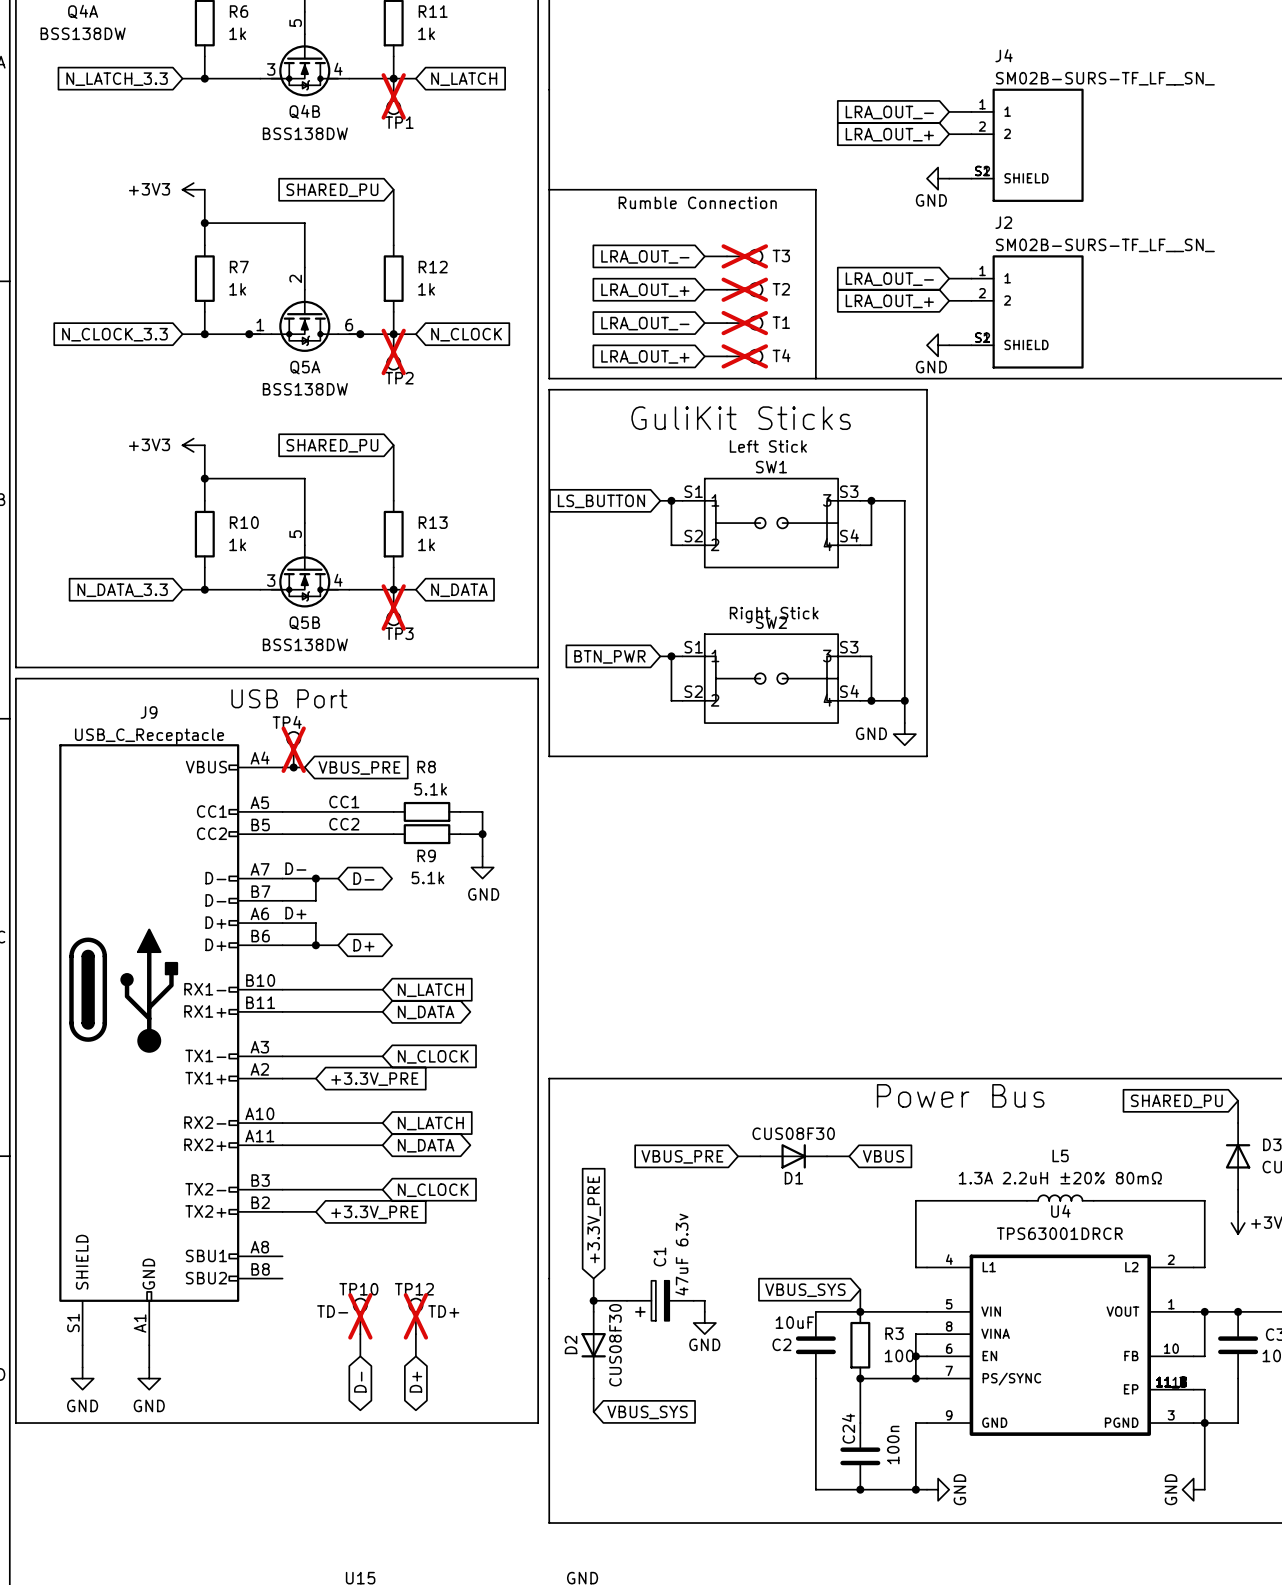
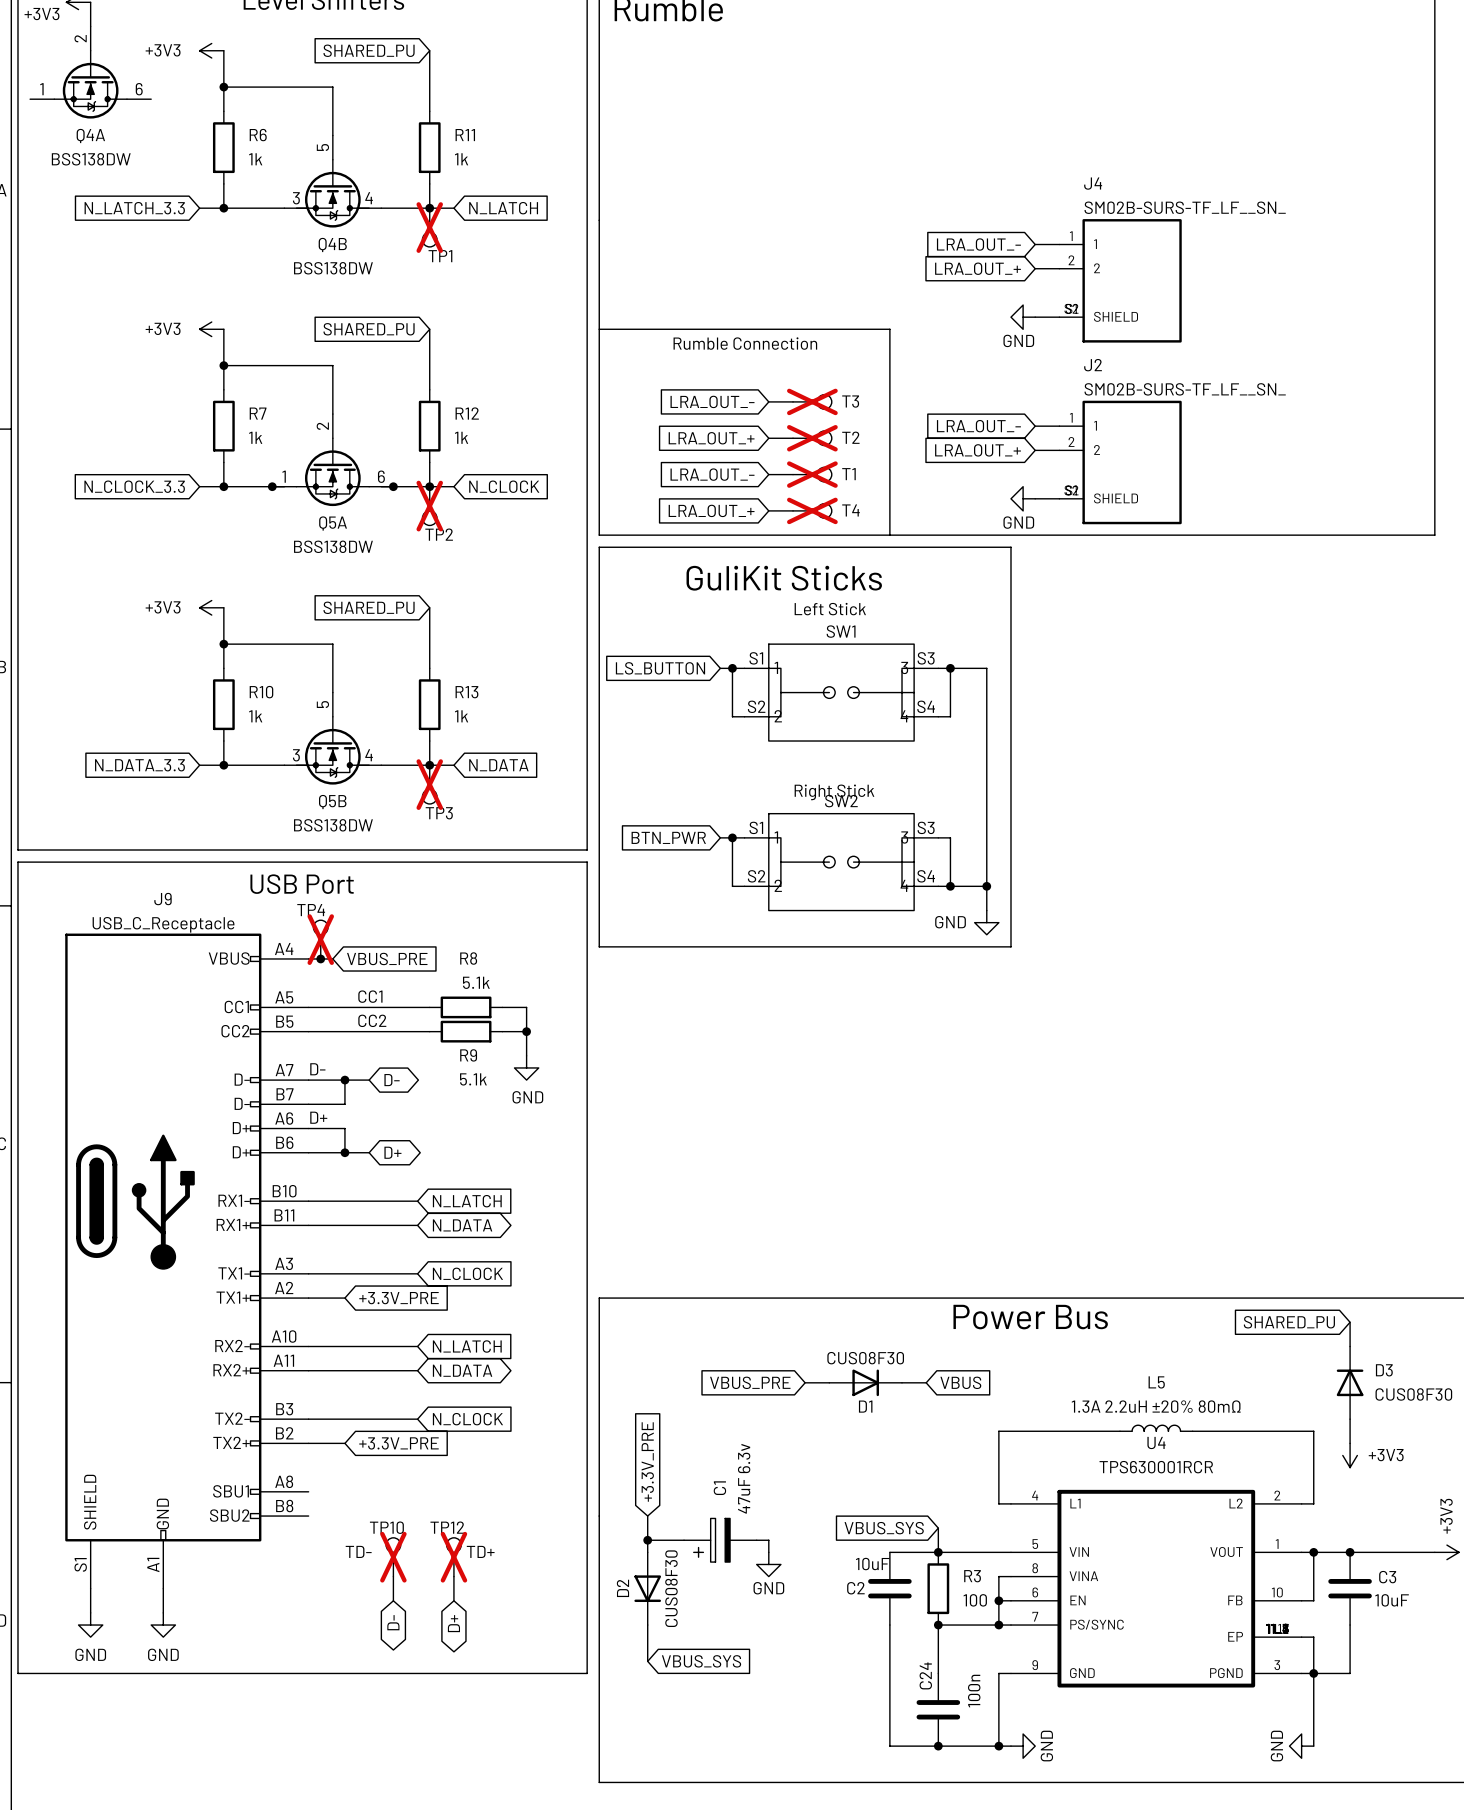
U4 value: TPS63001DRCR (1059, 1233) -> TPS630001RCR (1156, 1467)

